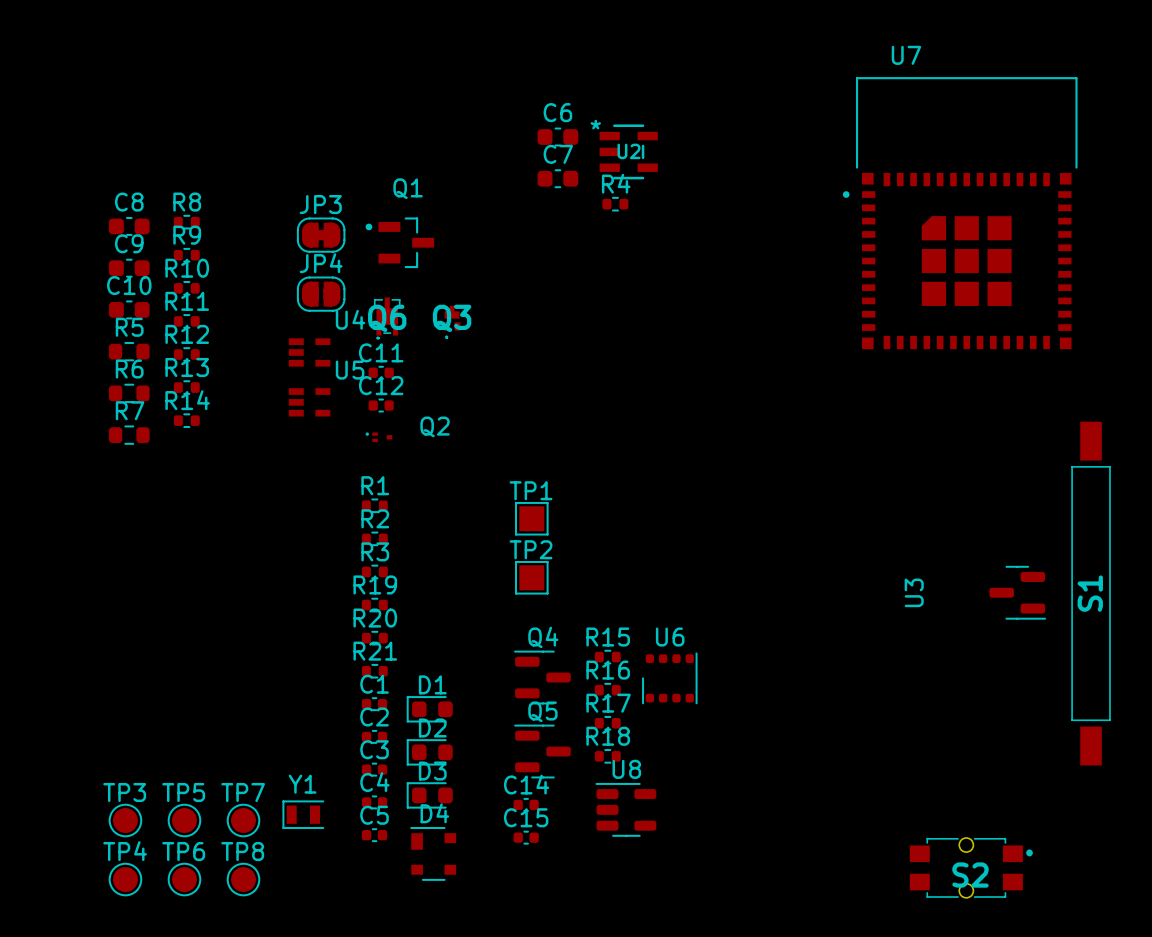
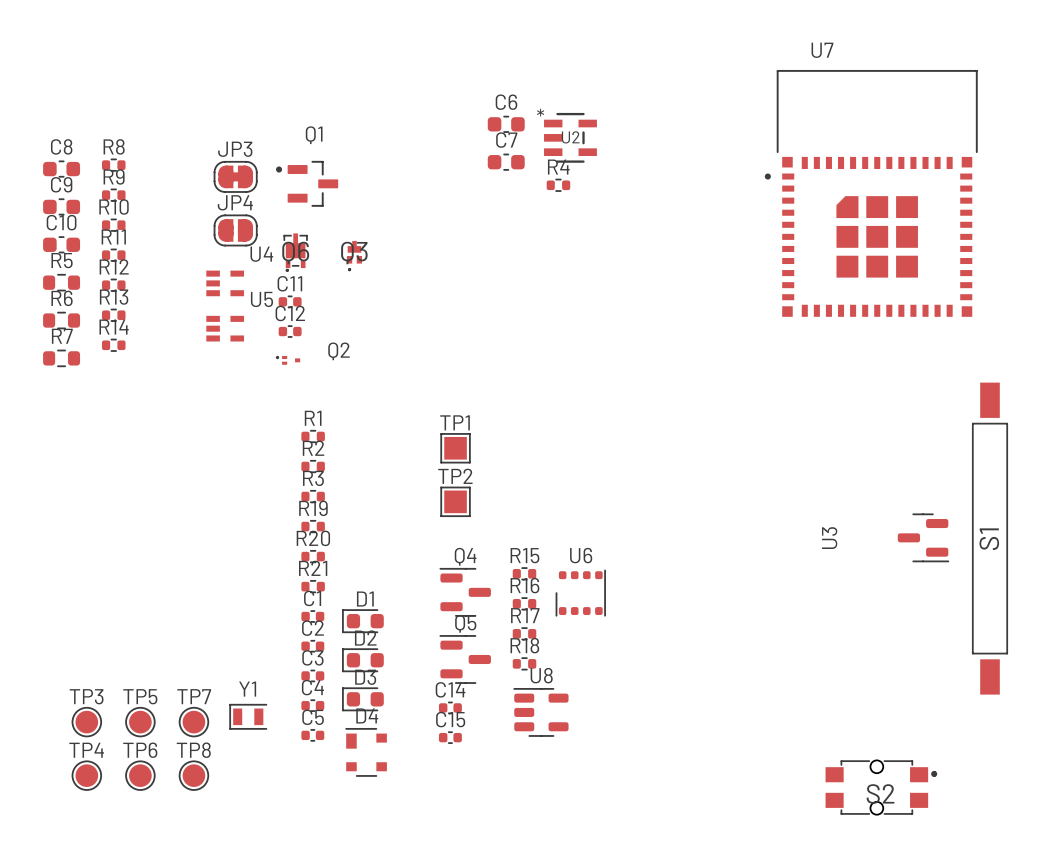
R8 position: (186, 222) -> (113, 165)
C8 position: (129, 226) -> (61, 169)
JP3 position: (321, 235) -> (235, 176)
Q1 position: (399, 242) -> (307, 183)
R9 position: (186, 255) -> (113, 195)
C9 position: (129, 268) -> (61, 206)
R10 position: (186, 288) -> (113, 225)
JP4 position: (321, 294) -> (235, 230)
C10 position: (129, 309) -> (61, 244)
Q6 position: (387, 318) -> (295, 252)
R11 position: (186, 321) -> (113, 255)
Q3 position: (452, 322) -> (354, 256)
R5 position: (129, 351) -> (61, 282)
U4 position: (309, 352) -> (225, 283)
R12 position: (186, 354) -> (113, 285)
C11 position: (381, 372) -> (290, 301)
R13 position: (186, 387) -> (113, 315)
R6 position: (129, 393) -> (61, 320)
U5 position: (309, 402) -> (225, 328)
C12 position: (381, 405) -> (290, 331)
R14 position: (186, 420) -> (113, 345)
R7 position: (129, 435) -> (61, 358)
Q2 position: (378, 437) -> (288, 360)
R1 position: (374, 505) -> (313, 436)
TP1 position: (531, 518) -> (455, 448)
R2 position: (374, 538) -> (313, 466)
R3 position: (374, 571) -> (313, 496)
TP2 position: (531, 577) -> (455, 501)
R19 position: (374, 605) -> (313, 526)
R20 position: (374, 638) -> (313, 556)
R15 position: (607, 657) -> (524, 573)
R21 position: (374, 671) -> (313, 586)
Q4 position: (542, 677) -> (465, 592)
U6 position: (669, 678) -> (580, 593)
R16 position: (607, 690) -> (524, 603)
C1 position: (374, 704) -> (312, 616)
D1 position: (429, 709) -> (362, 621)
R17 position: (607, 723) -> (524, 633)
C2 position: (374, 736) -> (312, 646)
Q5 position: (542, 751) -> (465, 659)
D2 position: (429, 752) -> (362, 660)
R18 position: (607, 756) -> (524, 663)
C3 position: (374, 769) -> (312, 675)
D3 position: (429, 795) -> (362, 699)
C4 position: (374, 802) -> (312, 705)
C14 position: (526, 804) -> (450, 707)
U8 position: (625, 809) -> (540, 712)
Y1 position: (303, 814) -> (248, 716)
TP3 position: (125, 820) -> (86, 722)
TP5 position: (184, 820) -> (140, 722)
TP7 position: (243, 820) -> (193, 722)
C5 position: (374, 835) -> (312, 735)
C15 position: (526, 837) -> (450, 737)
D4 position: (433, 853) -> (366, 752)
TP4 position: (125, 879) -> (86, 775)
TP6 position: (184, 879) -> (140, 775)
TP8 position: (243, 879) -> (193, 775)

